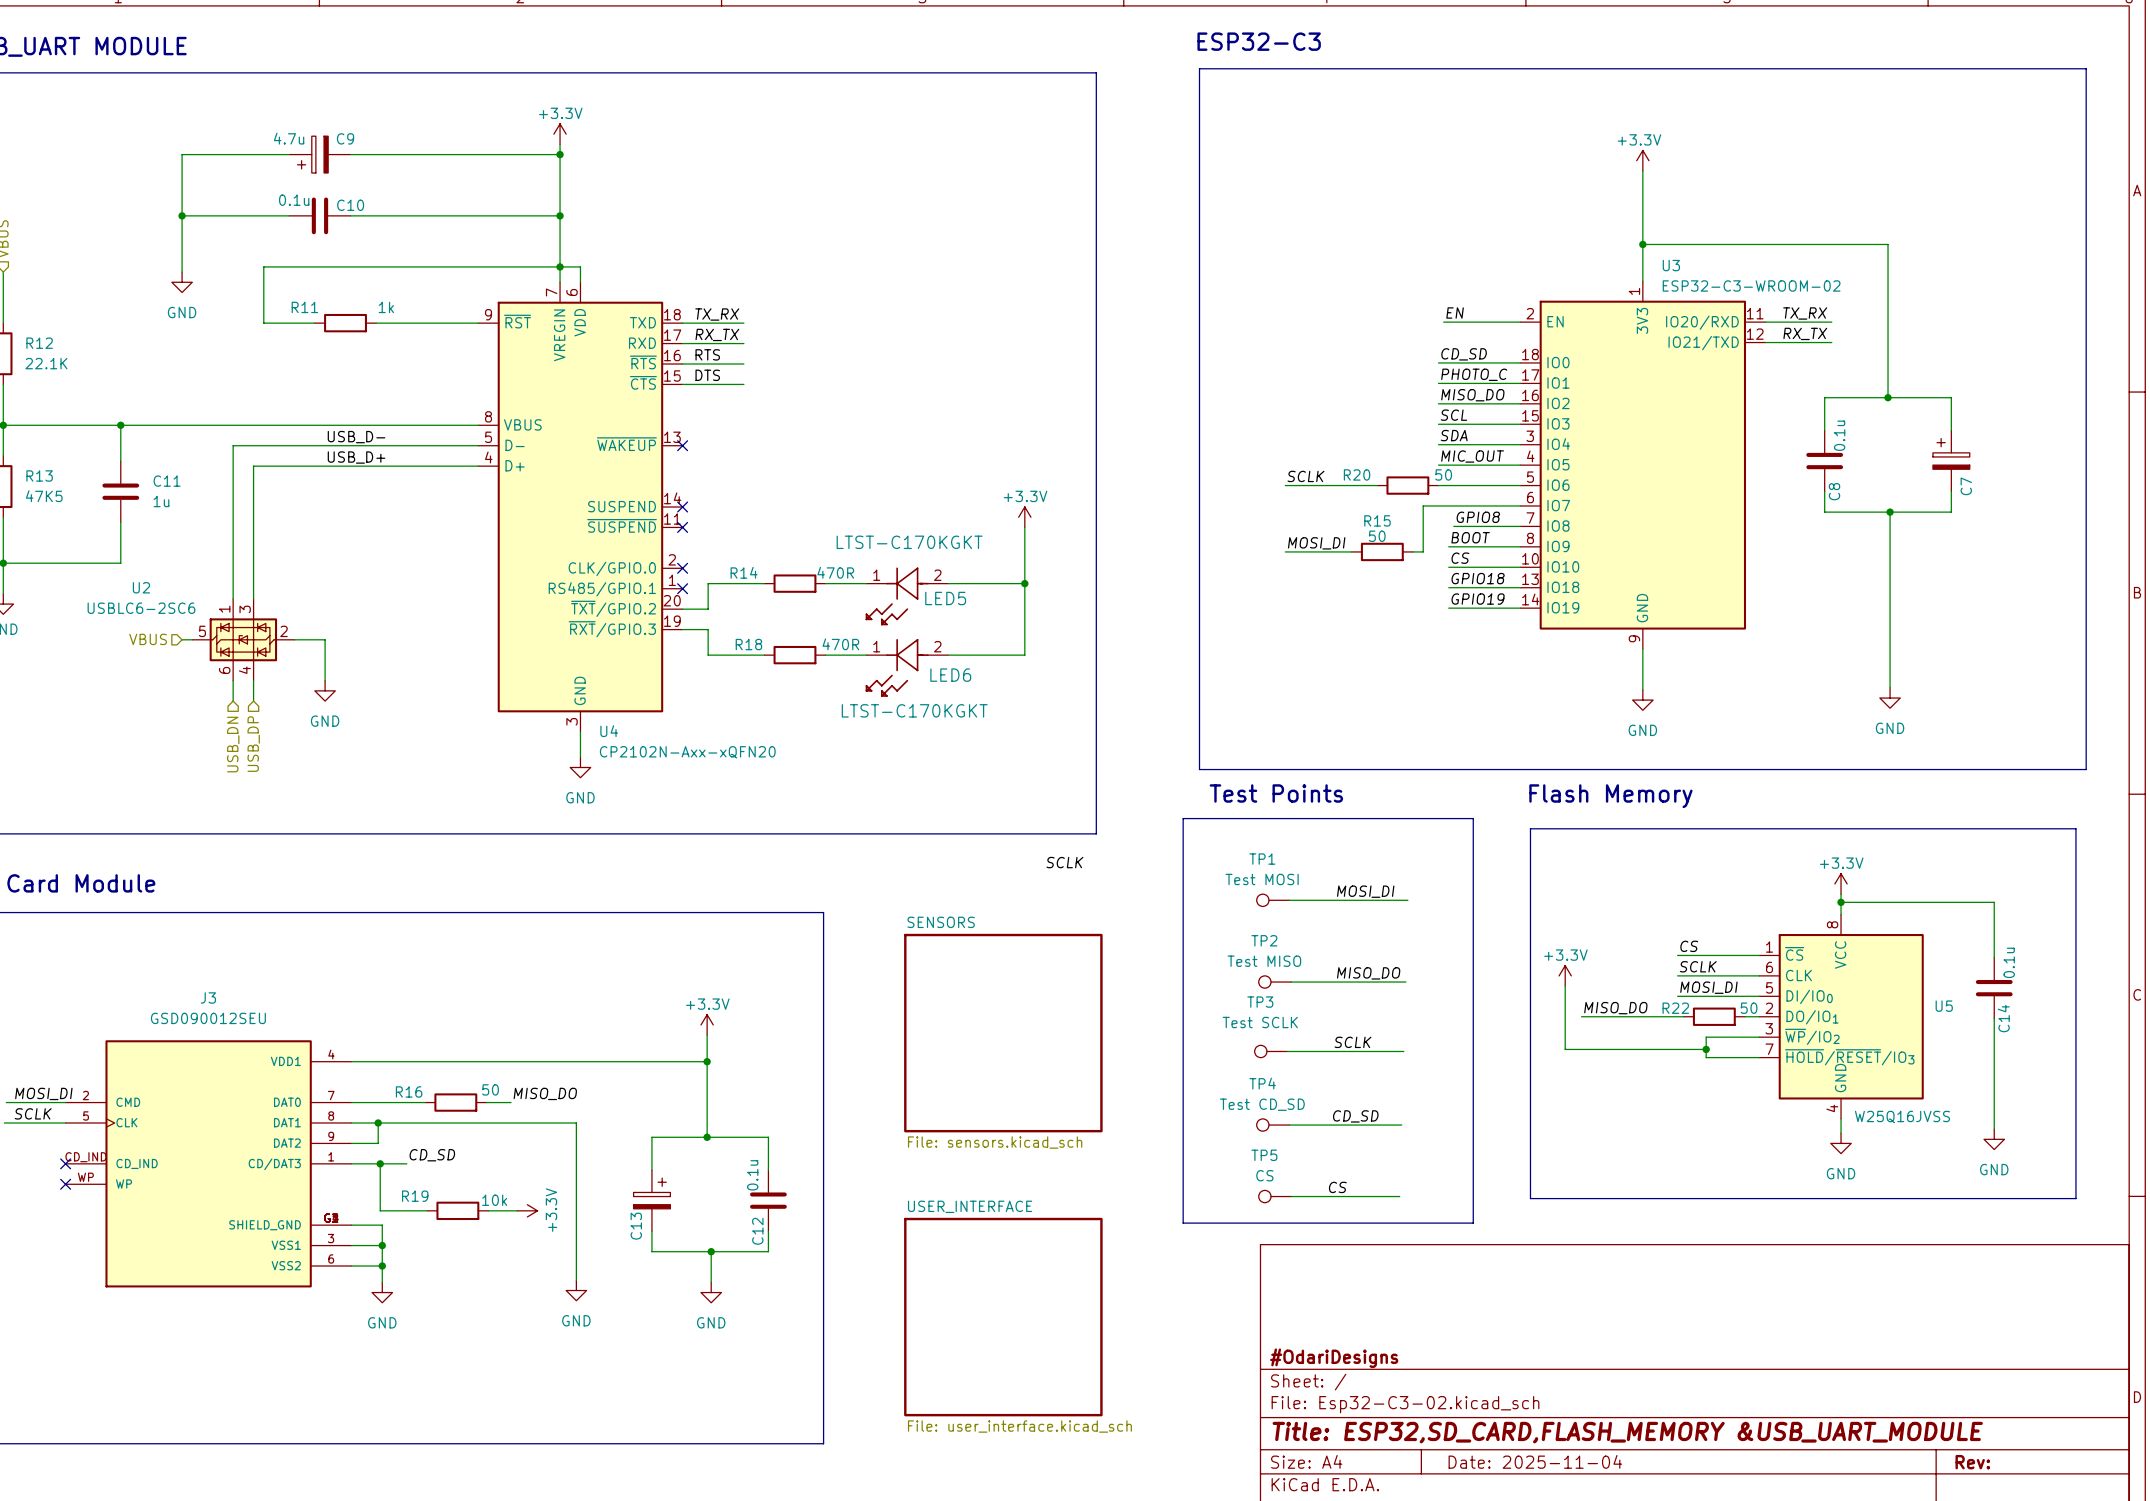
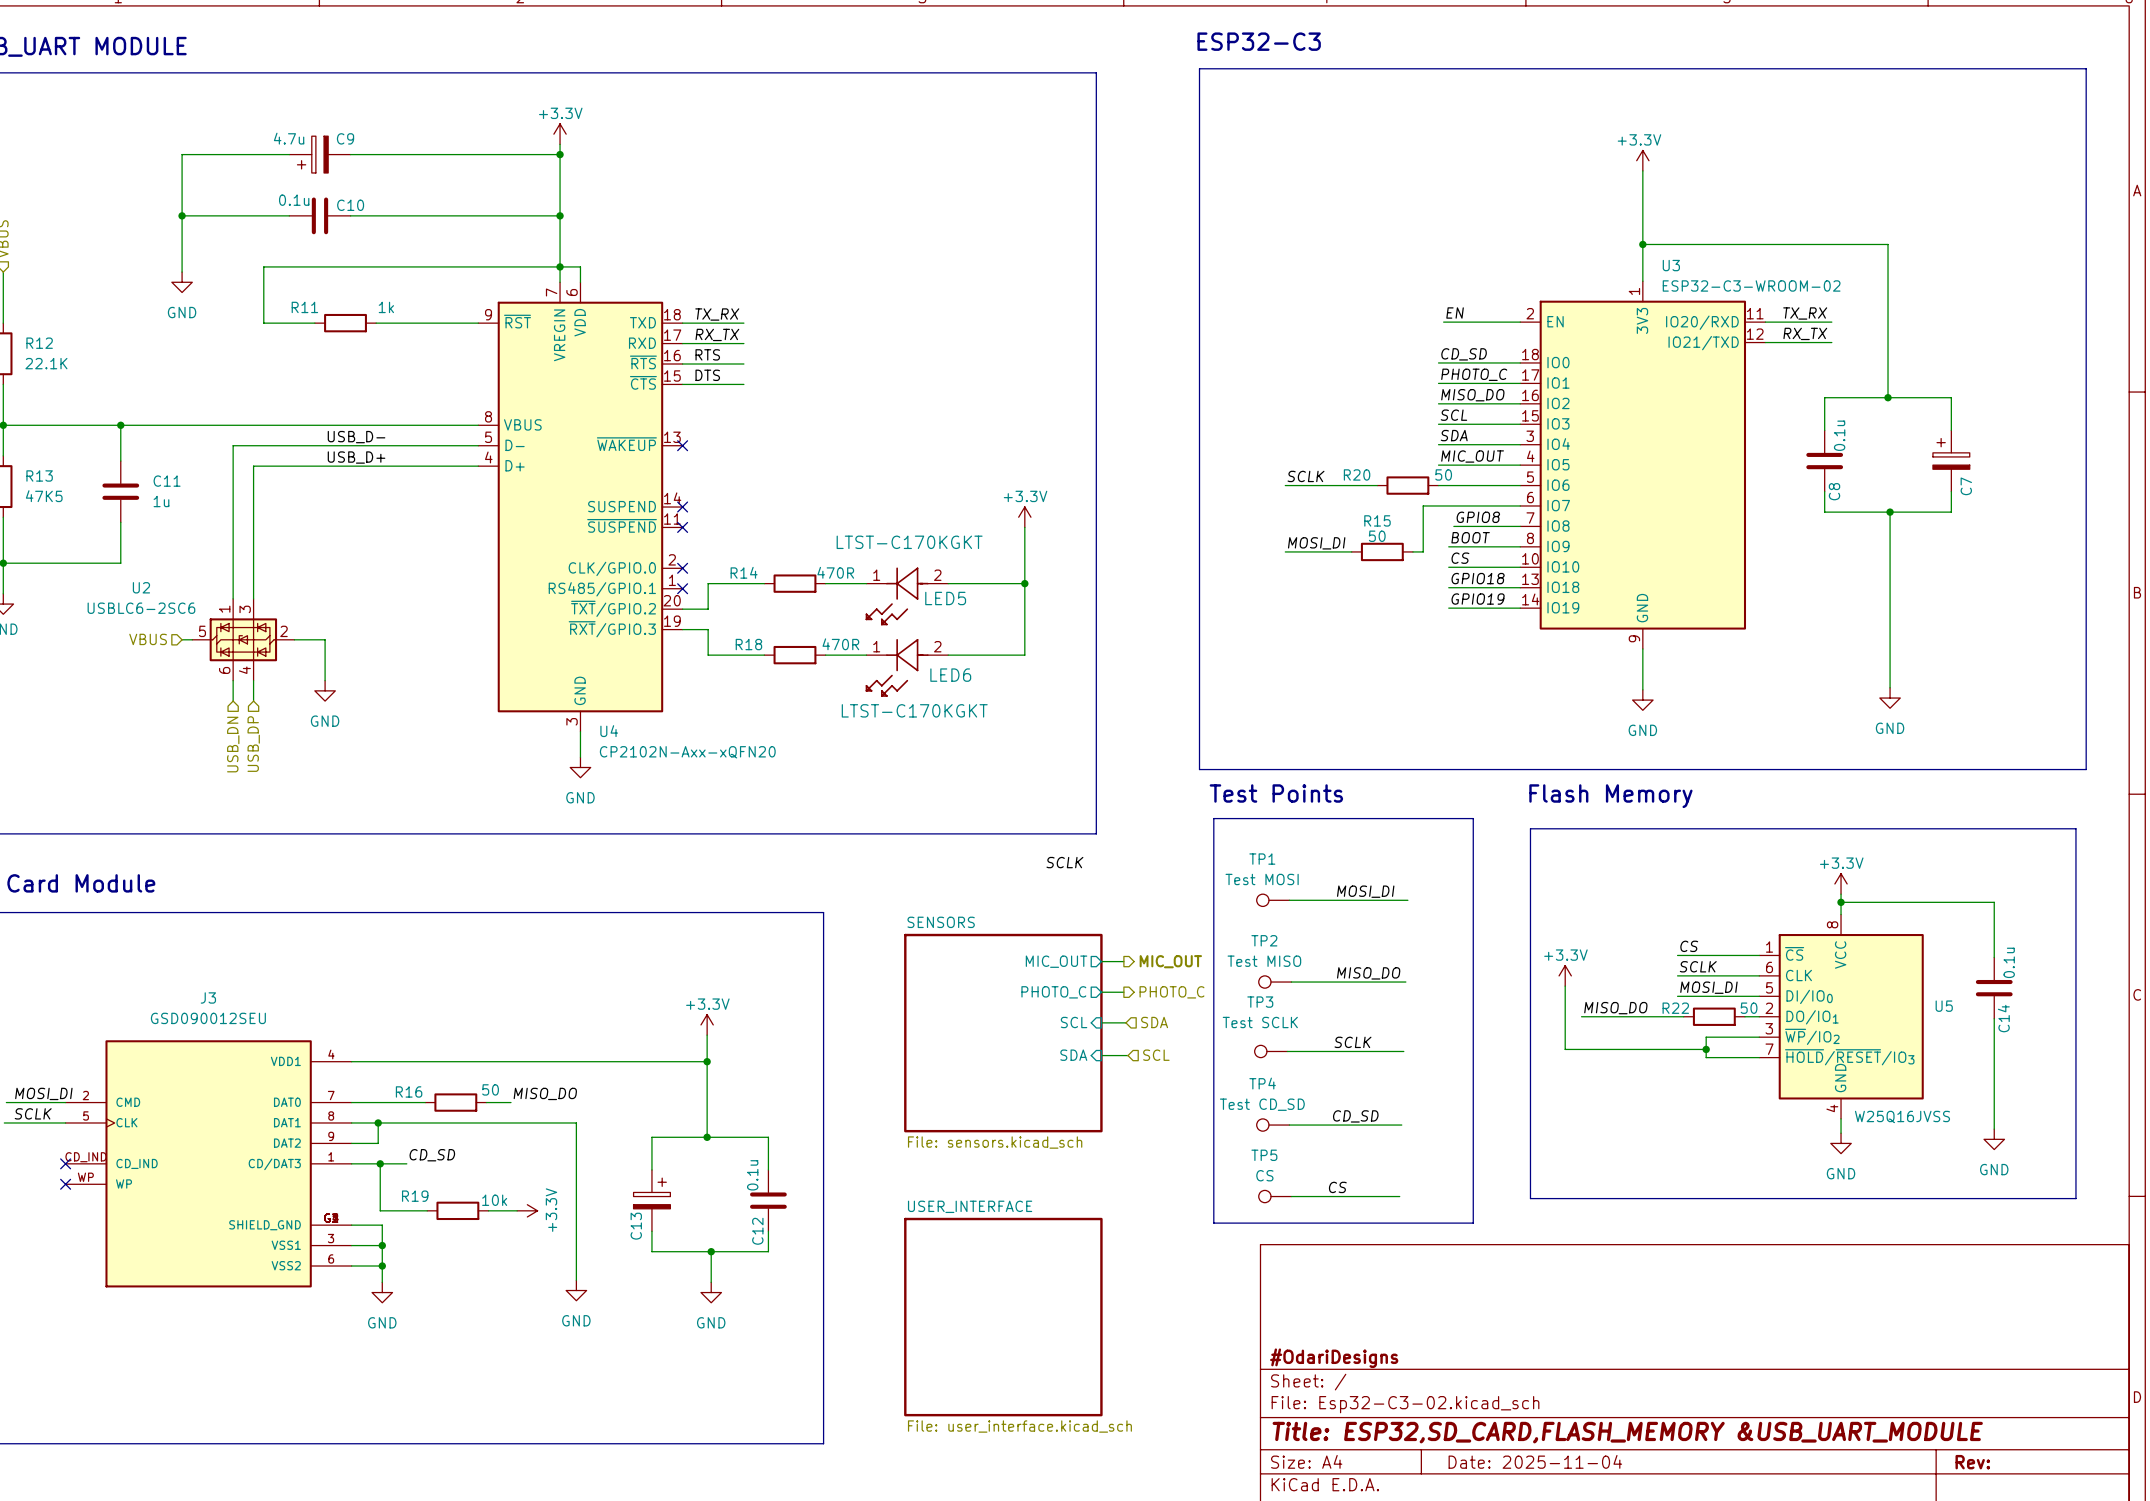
line: (1213, 818) (1183, 818) (1183, 1223) (1213, 1223) -> (1213, 818) (1213, 1223)
sheet pin: none -> MIC_OUT (1056, 961)
wire: none -> (1101, 961) (1123, 961)
hierarchical label: none -> MIC_OUT (1170, 961)
sheet pin: none -> PHOTO_C (1053, 992)
wire: none -> (1101, 992) (1123, 992)
hierarchical label: none -> PHOTO_C (1171, 992)
sheet pin: none -> SCL (1074, 1022)
wire: none -> (1101, 1022) (1125, 1022)
hierarchical label: none -> SDA (1154, 1022)
sheet pin: none -> SDA (1073, 1055)
wire: none -> (1101, 1055) (1127, 1055)
hierarchical label: none -> SCL (1156, 1055)

